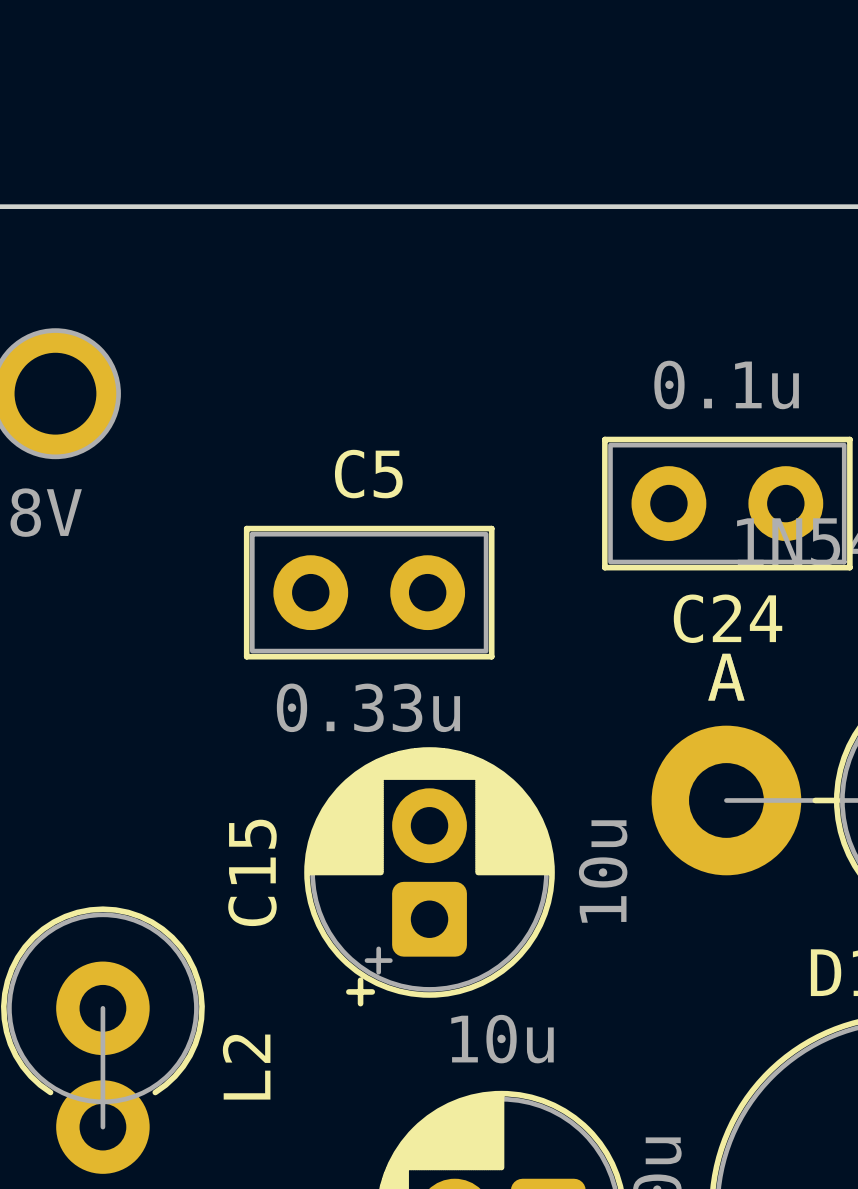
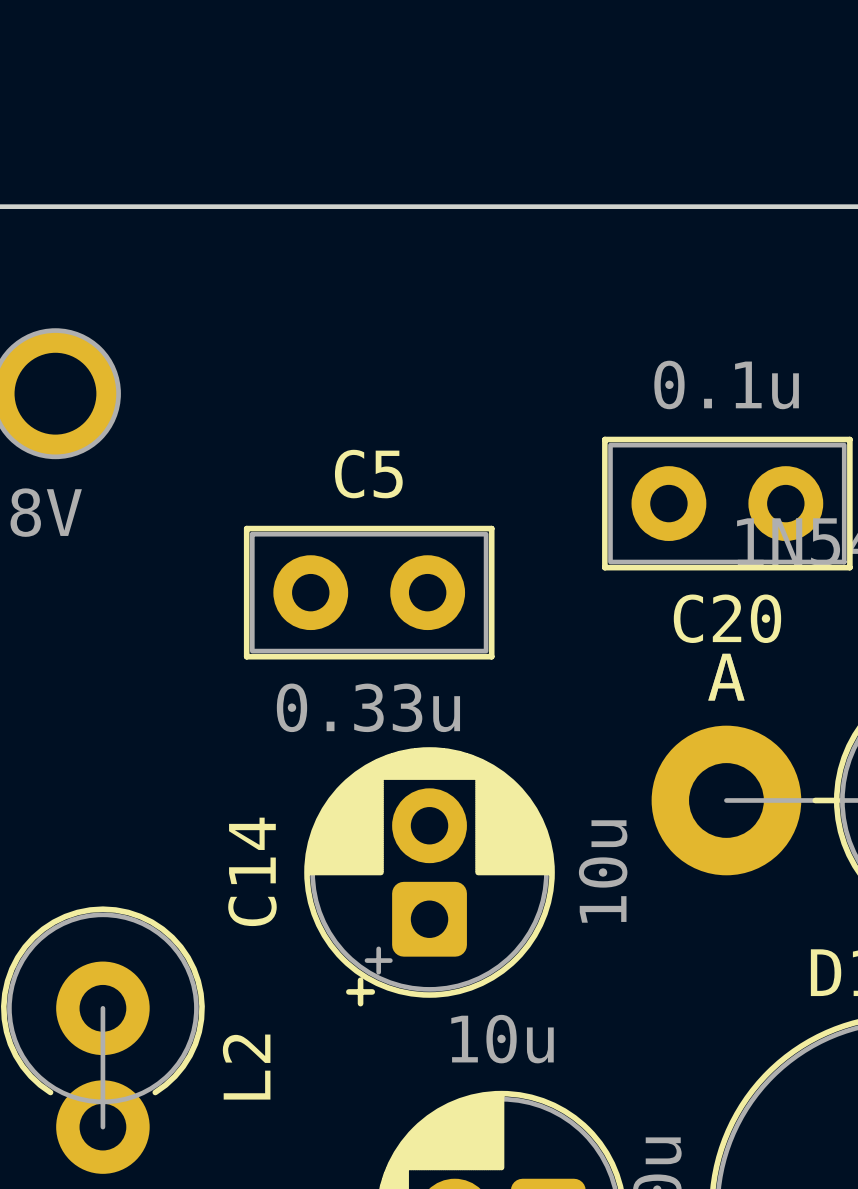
C24 name: C24 (728, 618) -> C20 (727, 618)
C15 name: C15 (252, 872) -> C14 (252, 871)

